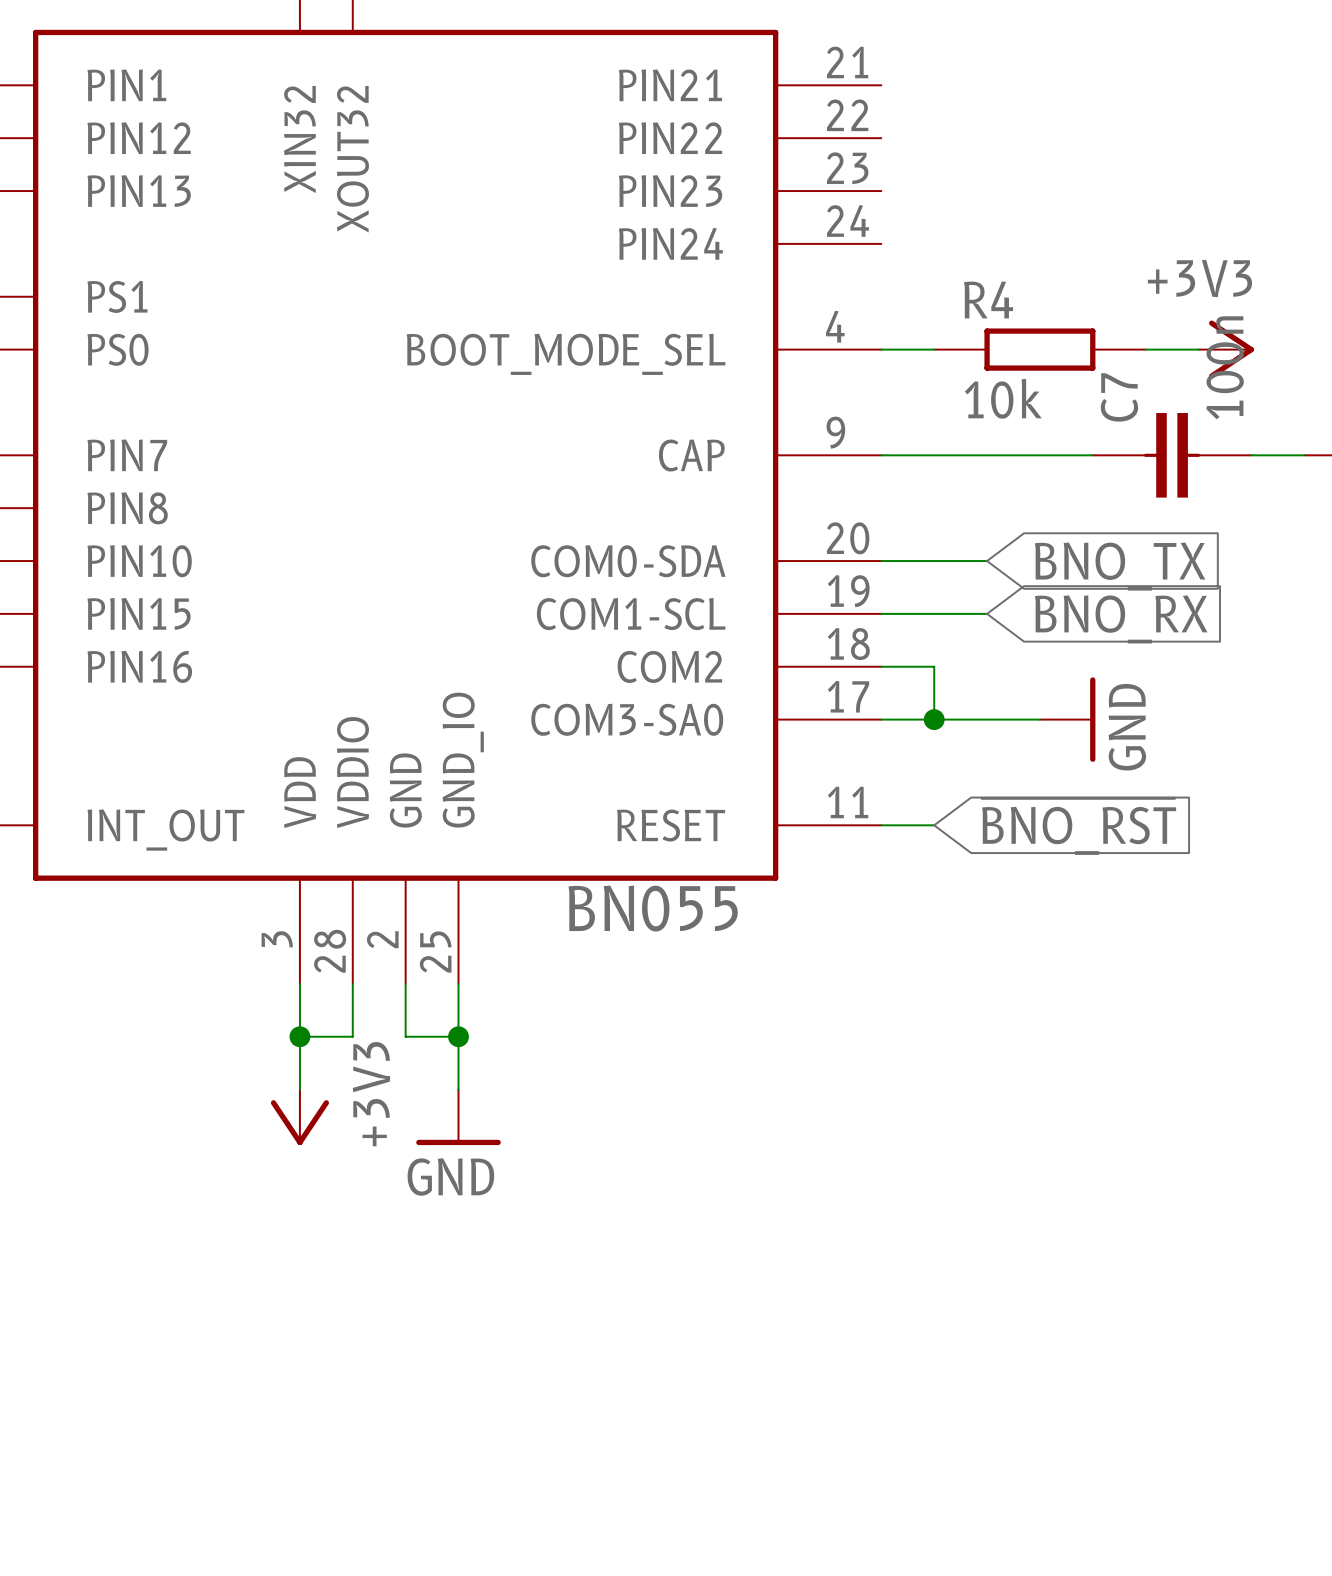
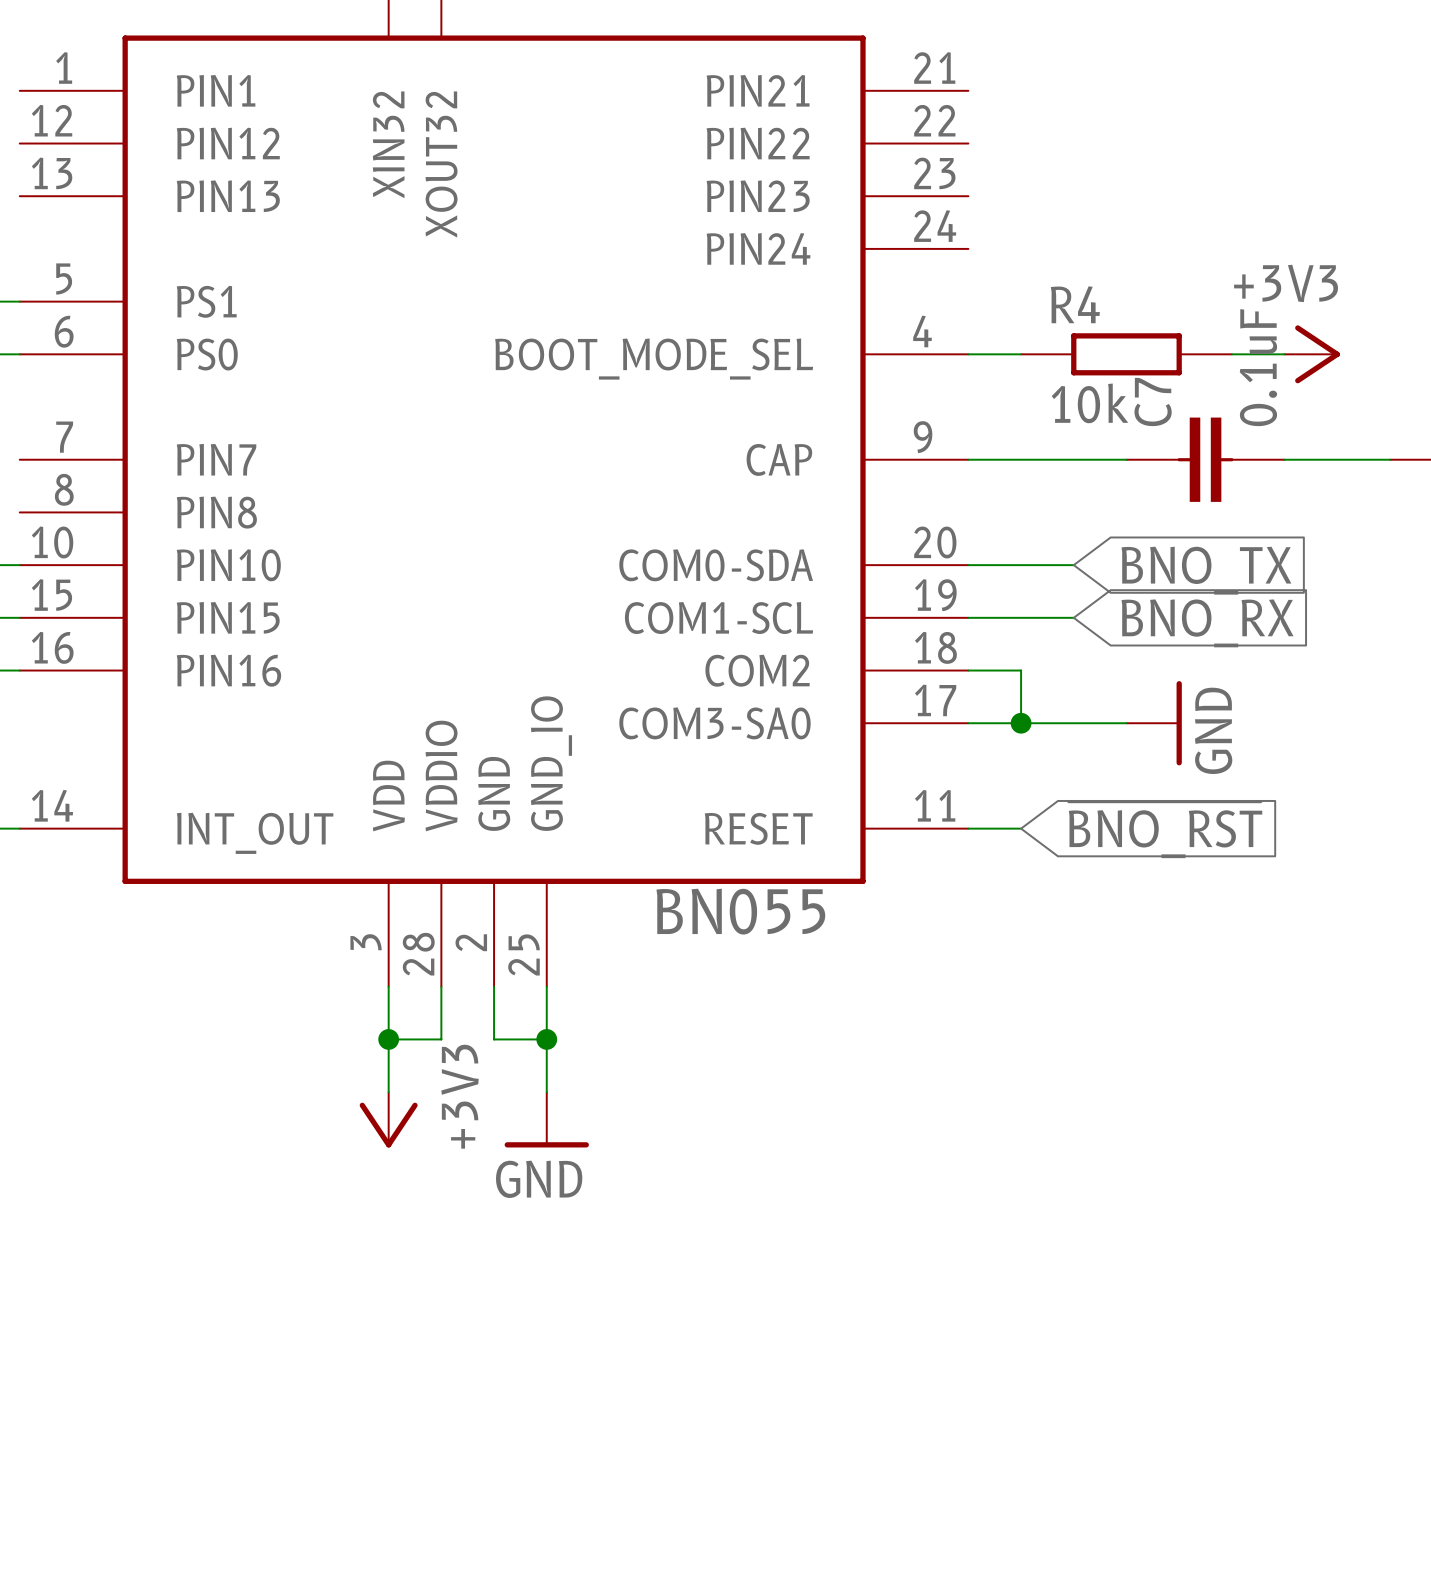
C7 value: 100n (1225, 367) -> 0.1uF (1258, 367)
C7 position: (1172, 455) -> (1205, 459)

